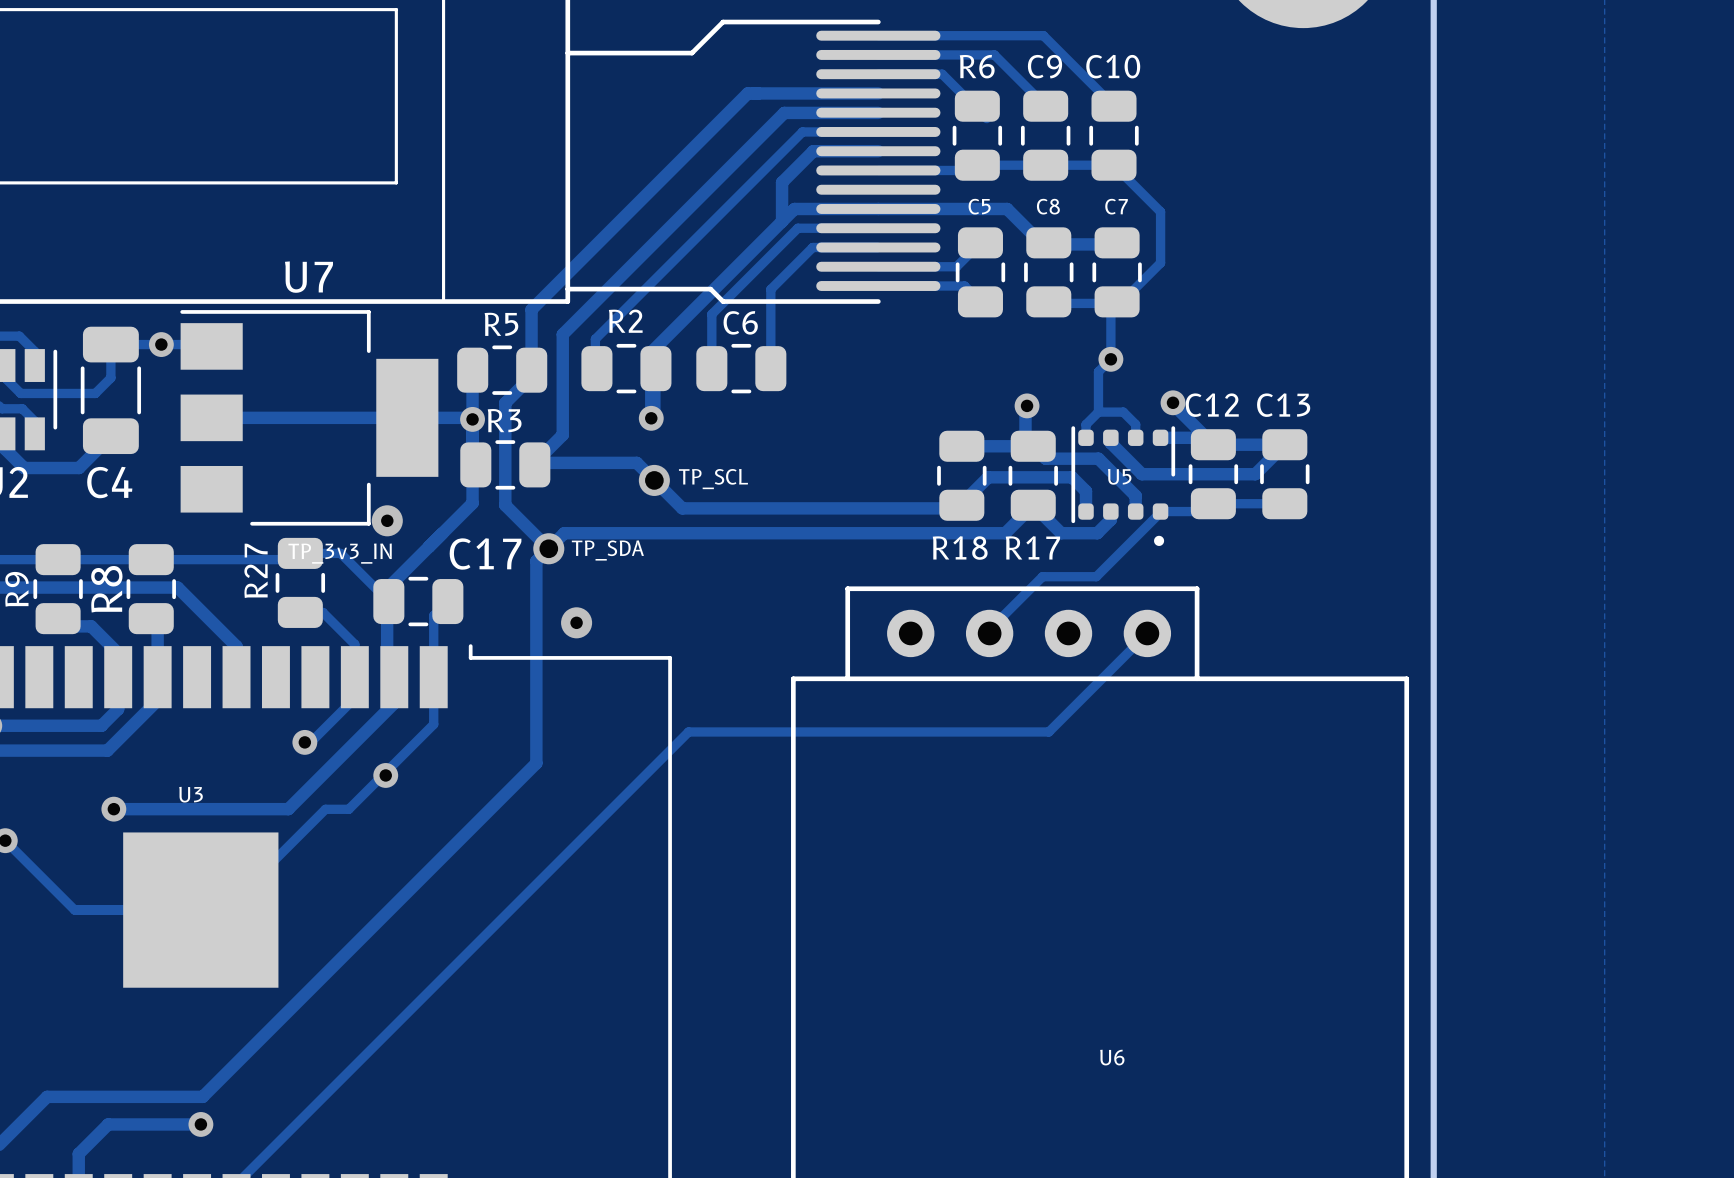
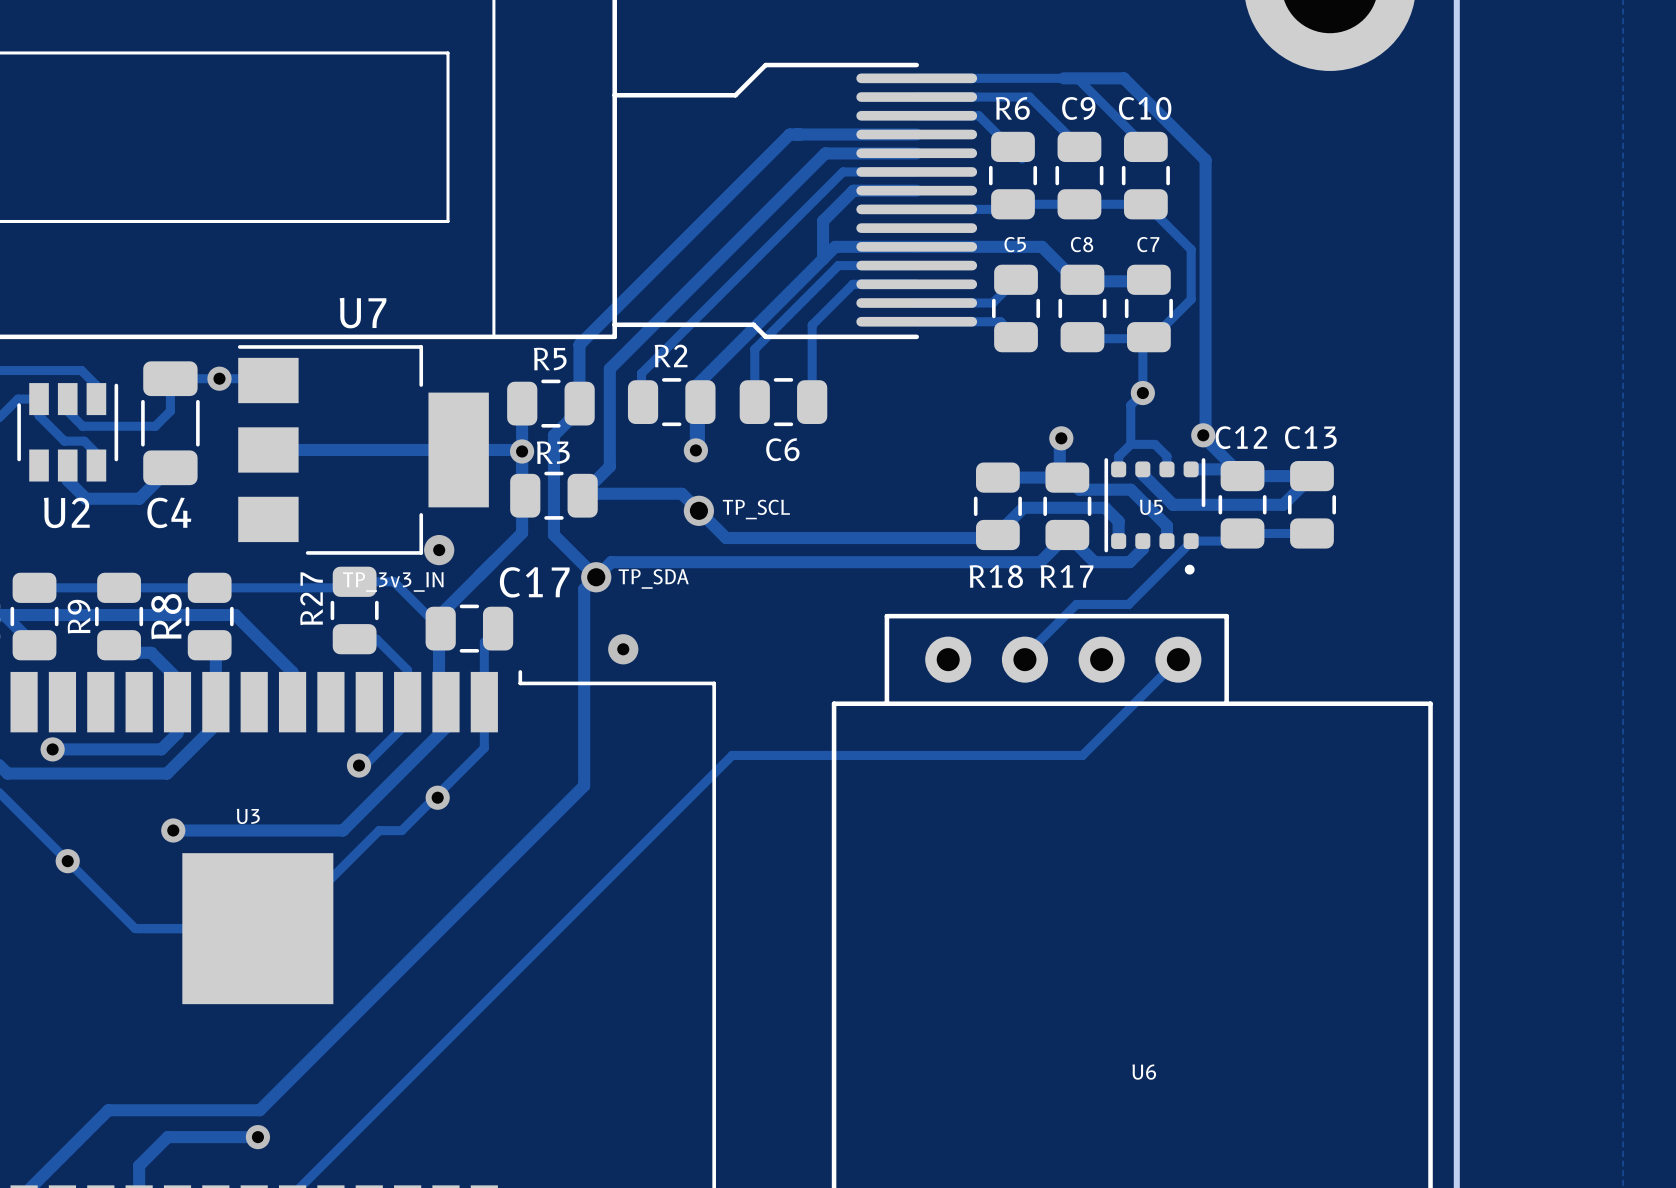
track: none -> (1063, 78) (1123, 78) (1205, 160) (1205, 432)
C6 name position: C6 (740, 322) -> C6 (782, 449)

